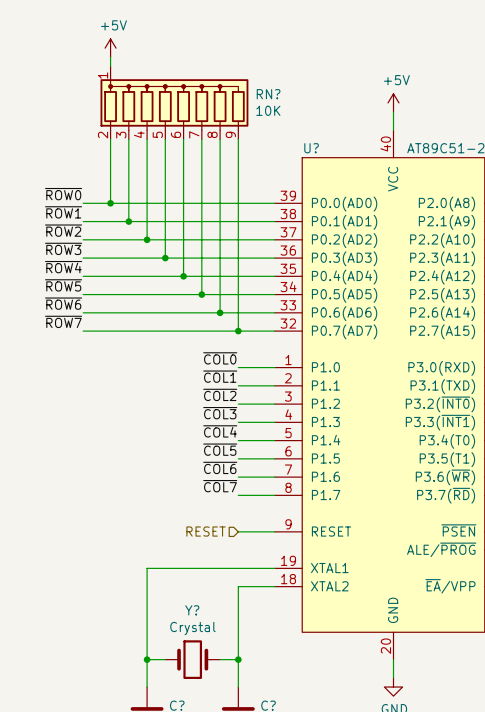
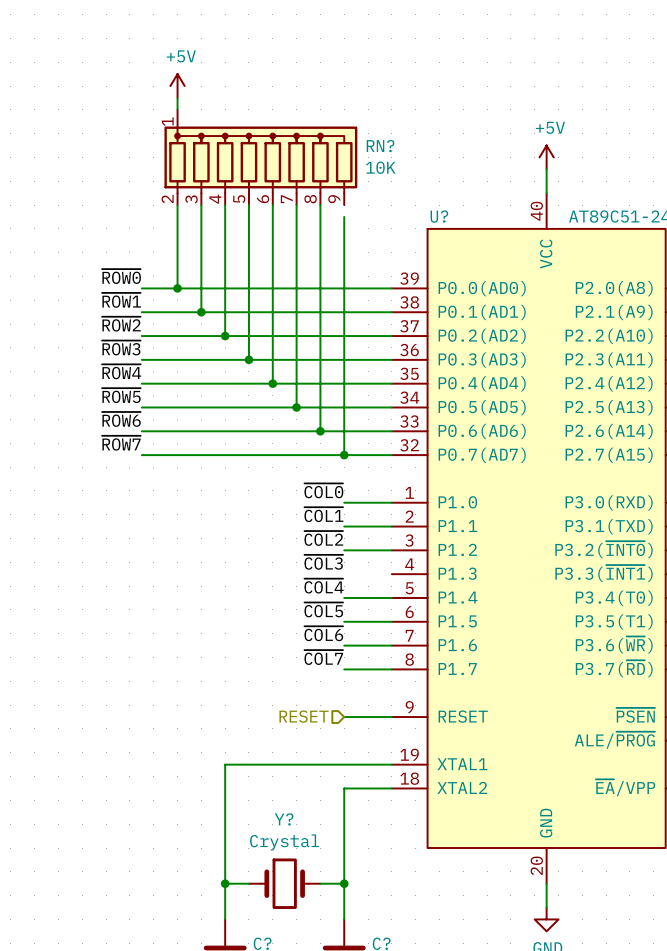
wire: (238, 139) (238, 148) -> none
wire: (238, 422) (274, 422) -> none

